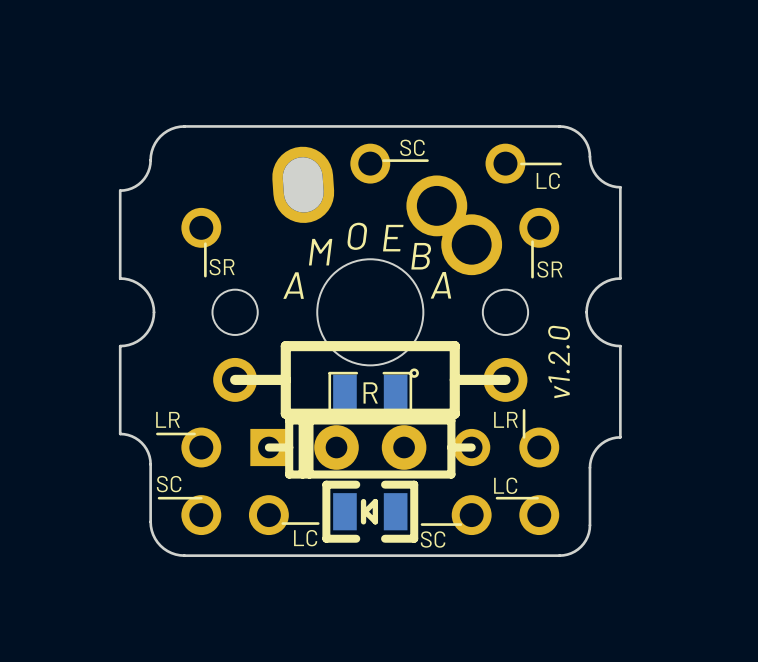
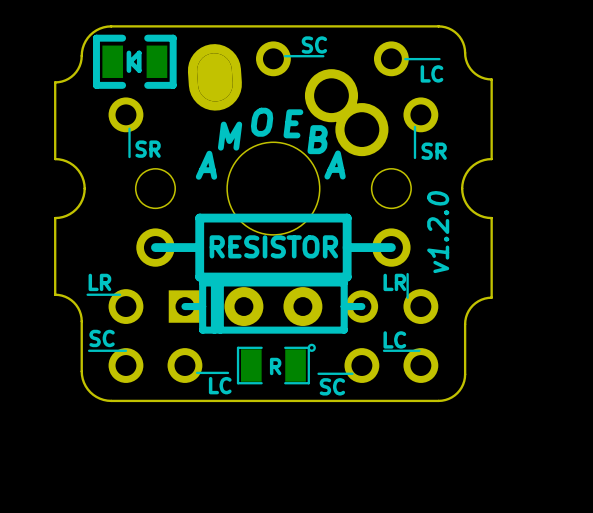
part: none -> (134, 61)
part: (373, 391) -> none
part value: R (370, 392) -> RESISTOR (273, 246)
part footprint: [322, 480, 419, 543] -> [236, 343, 316, 385]
text: none -> R (275, 366)

